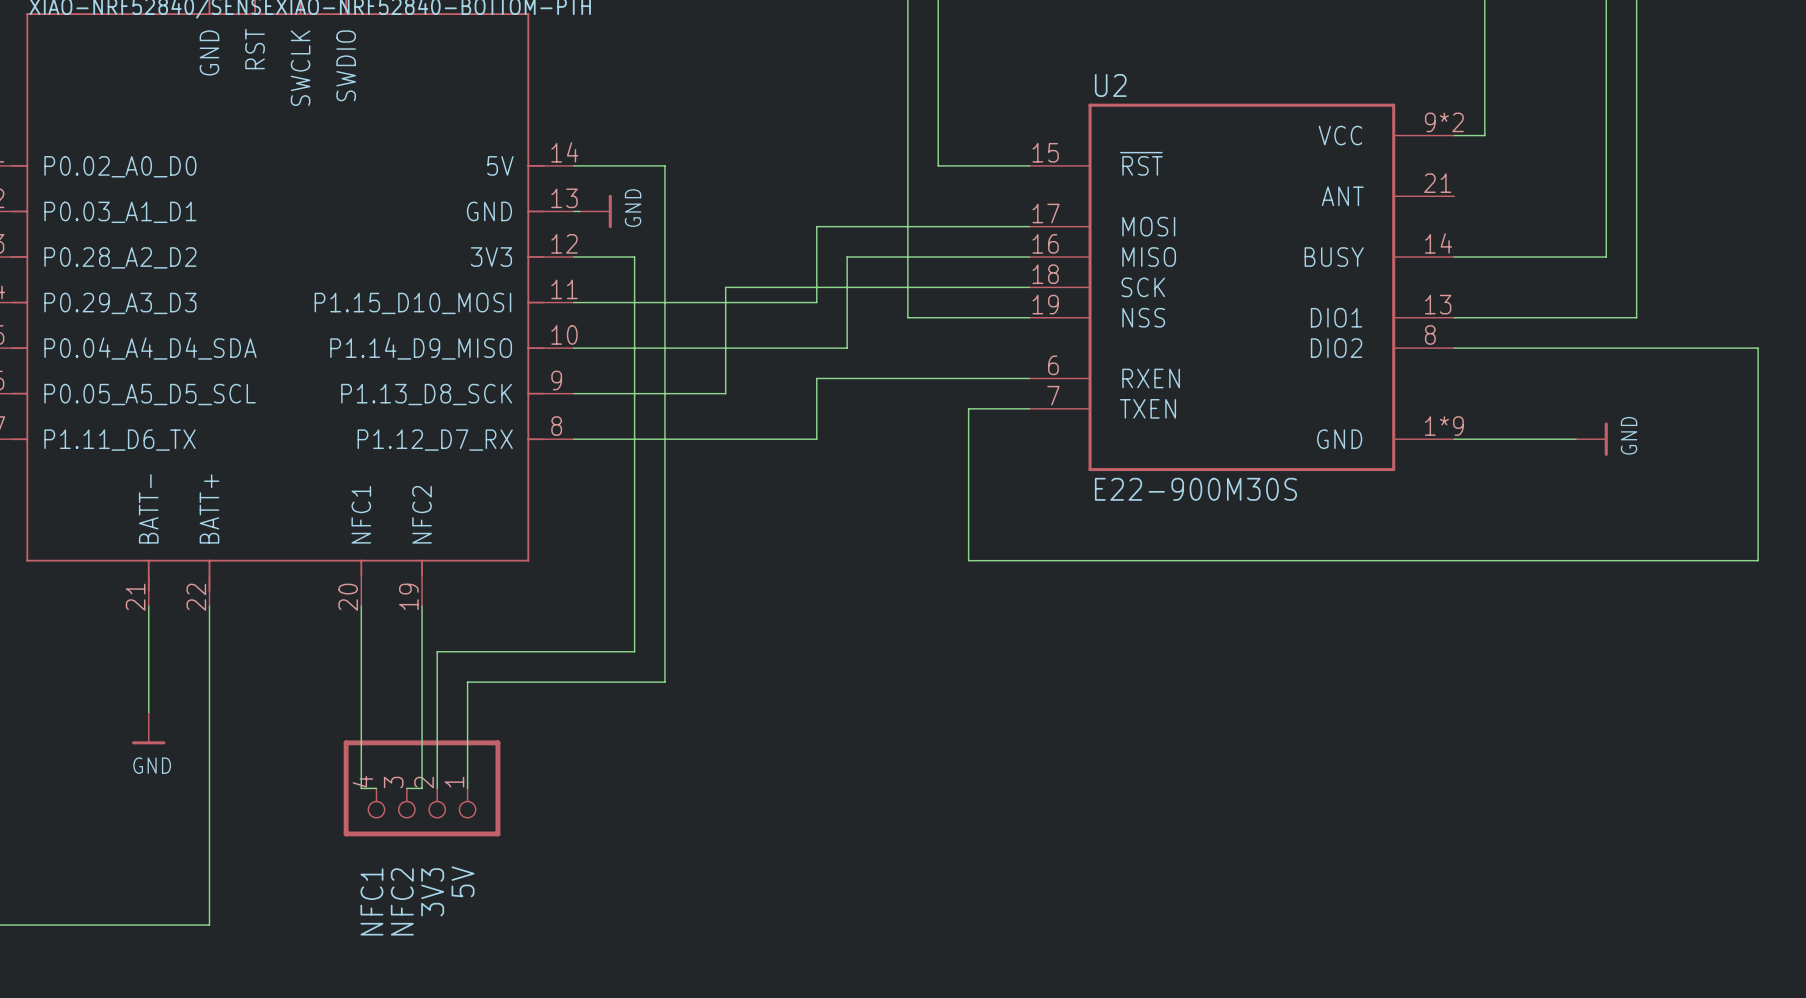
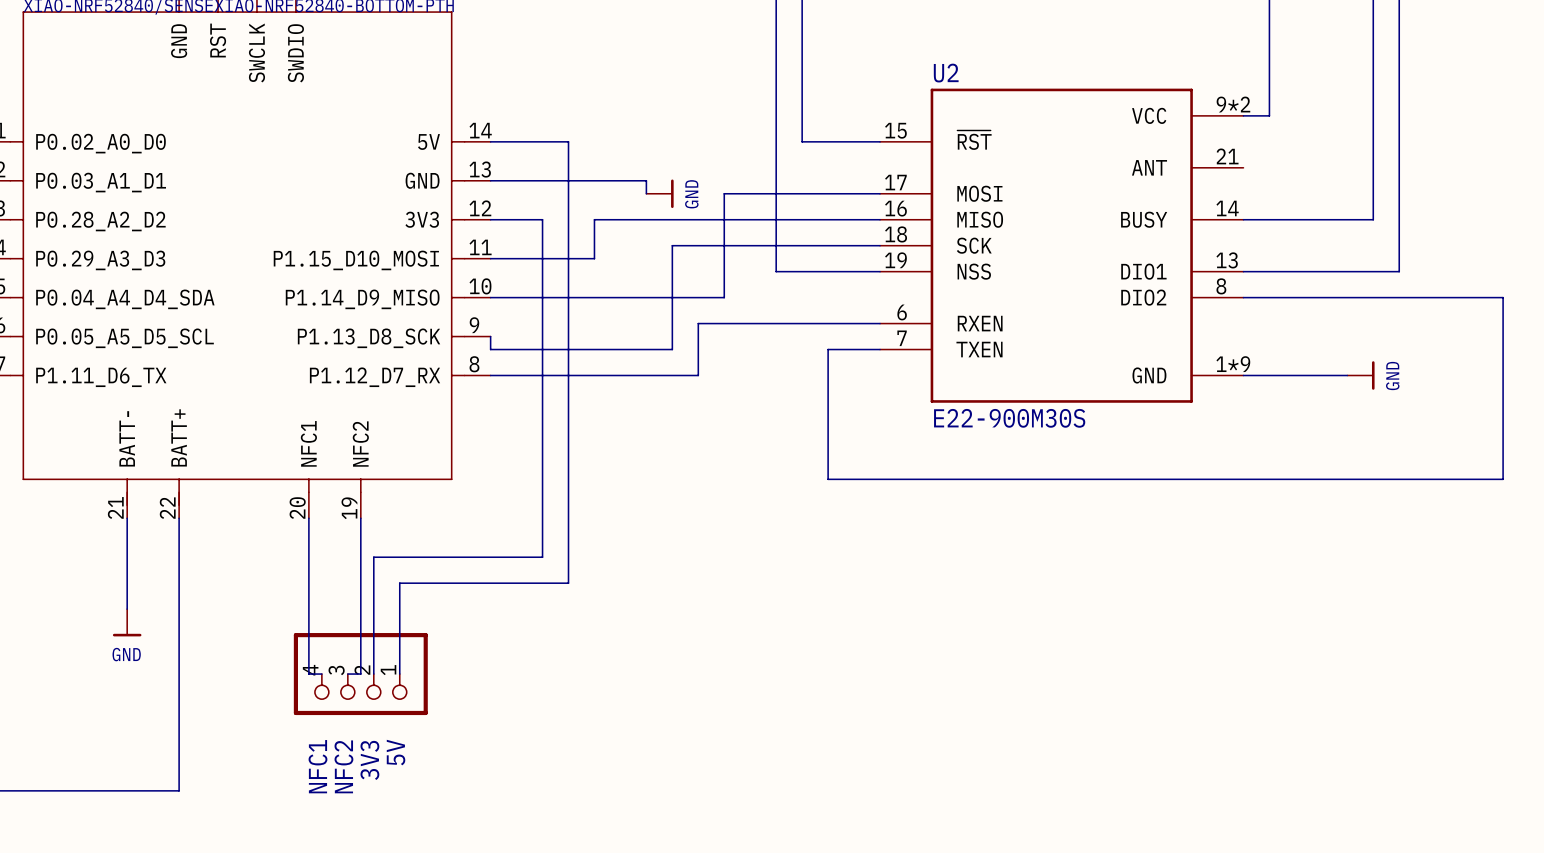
wire: none -> (495, 180) (646, 180) (646, 193)
power symbol position: GND (595, 211) -> GND (660, 193)
wire: (847, 226) (816, 226) (816, 302) (695, 302) -> (724, 193) (724, 219) (594, 219) (594, 258)
wire: (786, 287) (725, 287) (725, 393) (573, 393) -> (672, 245) (672, 349) (490, 349) (490, 336)

